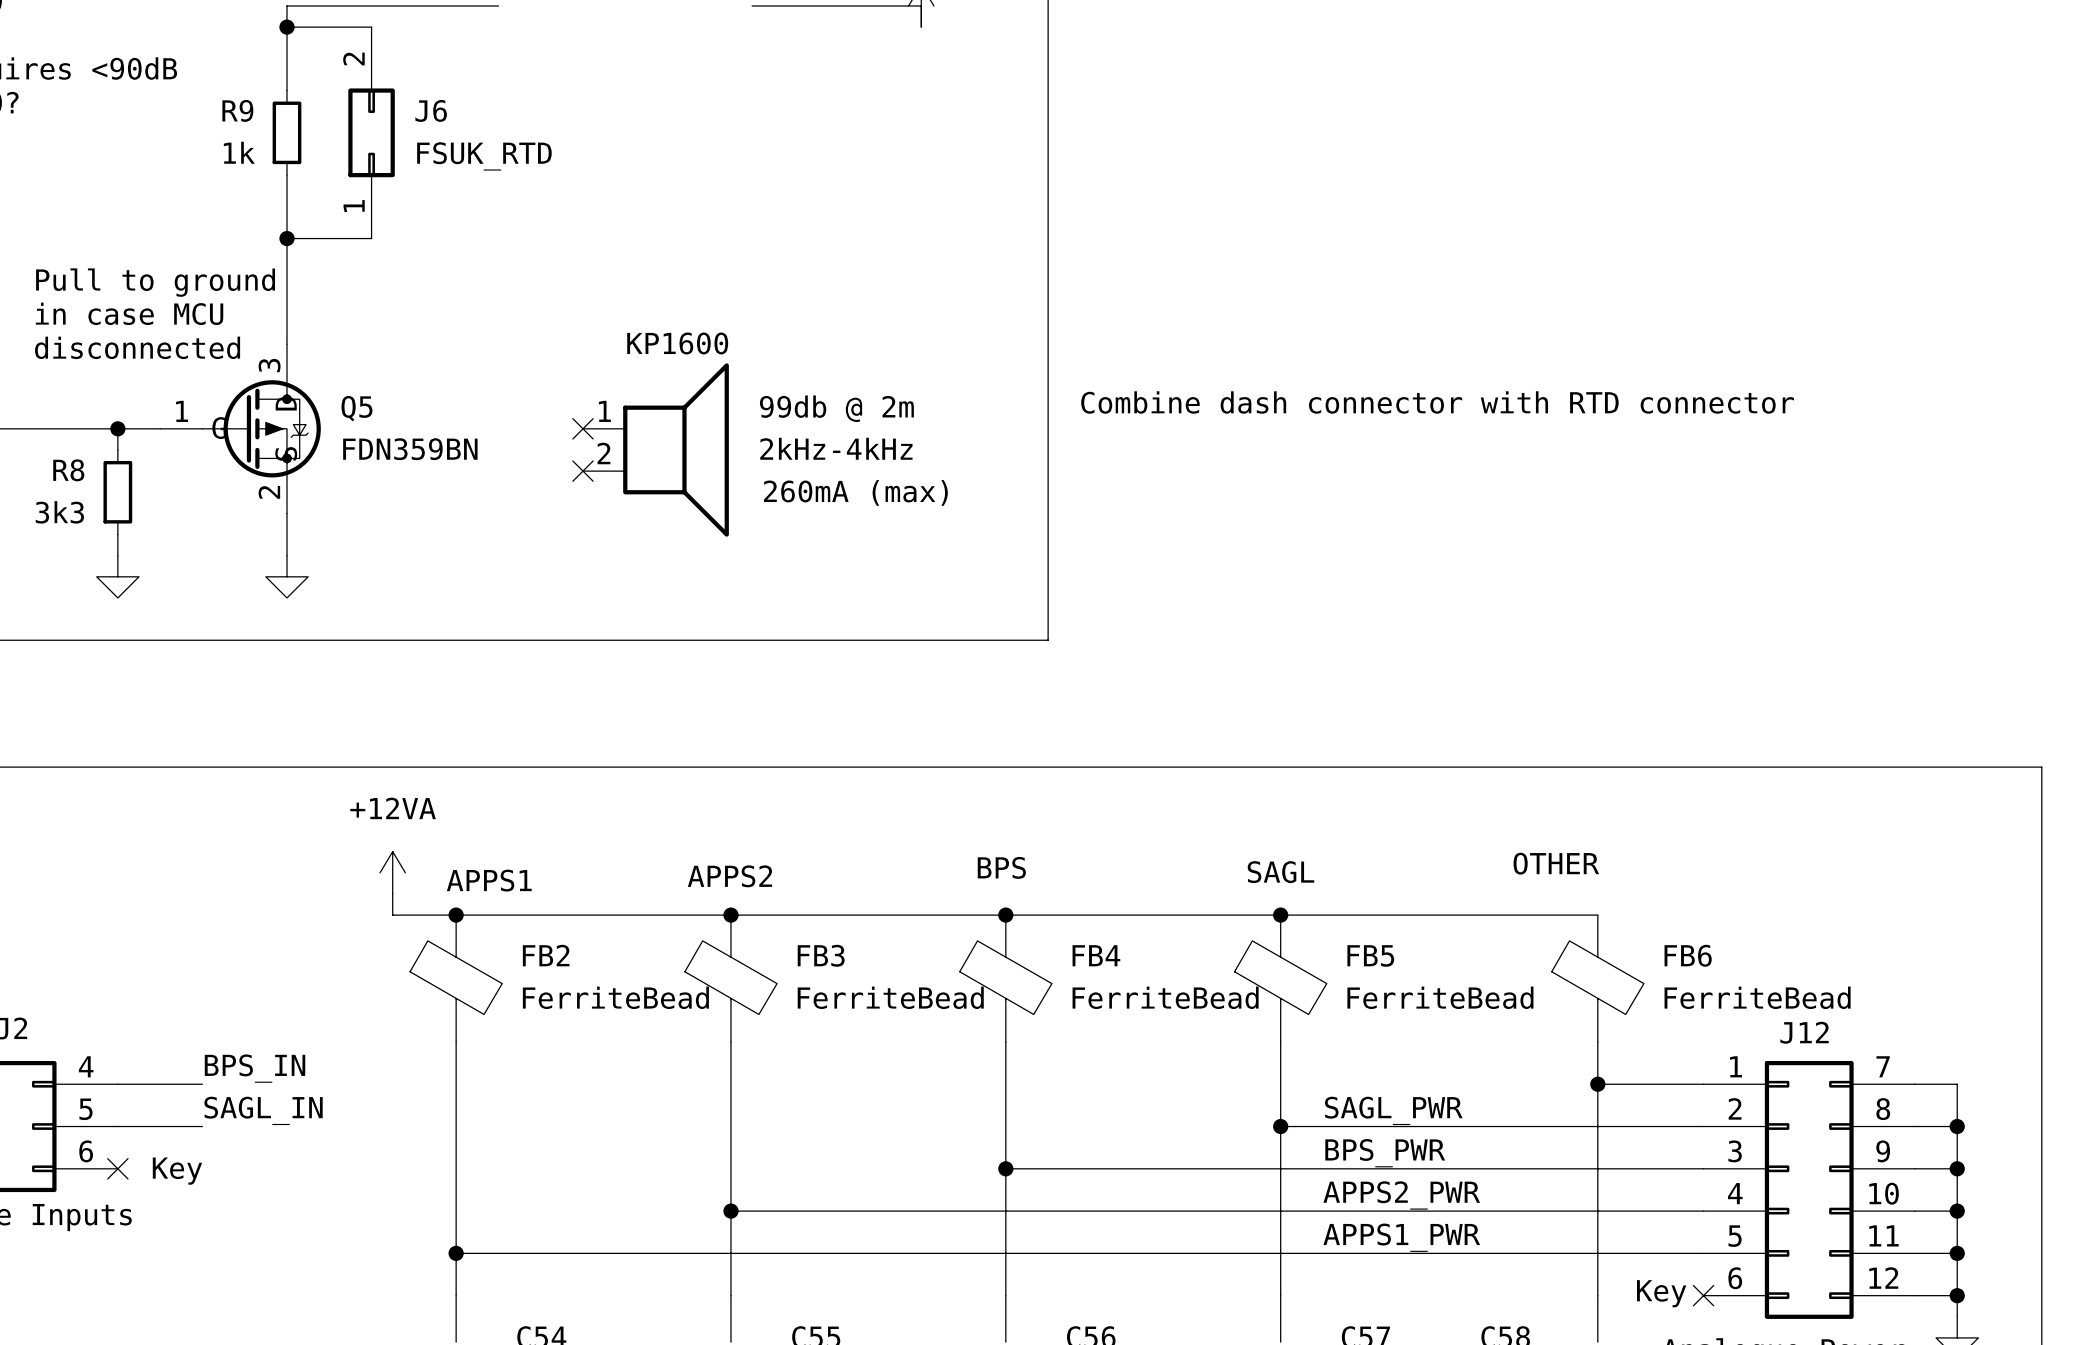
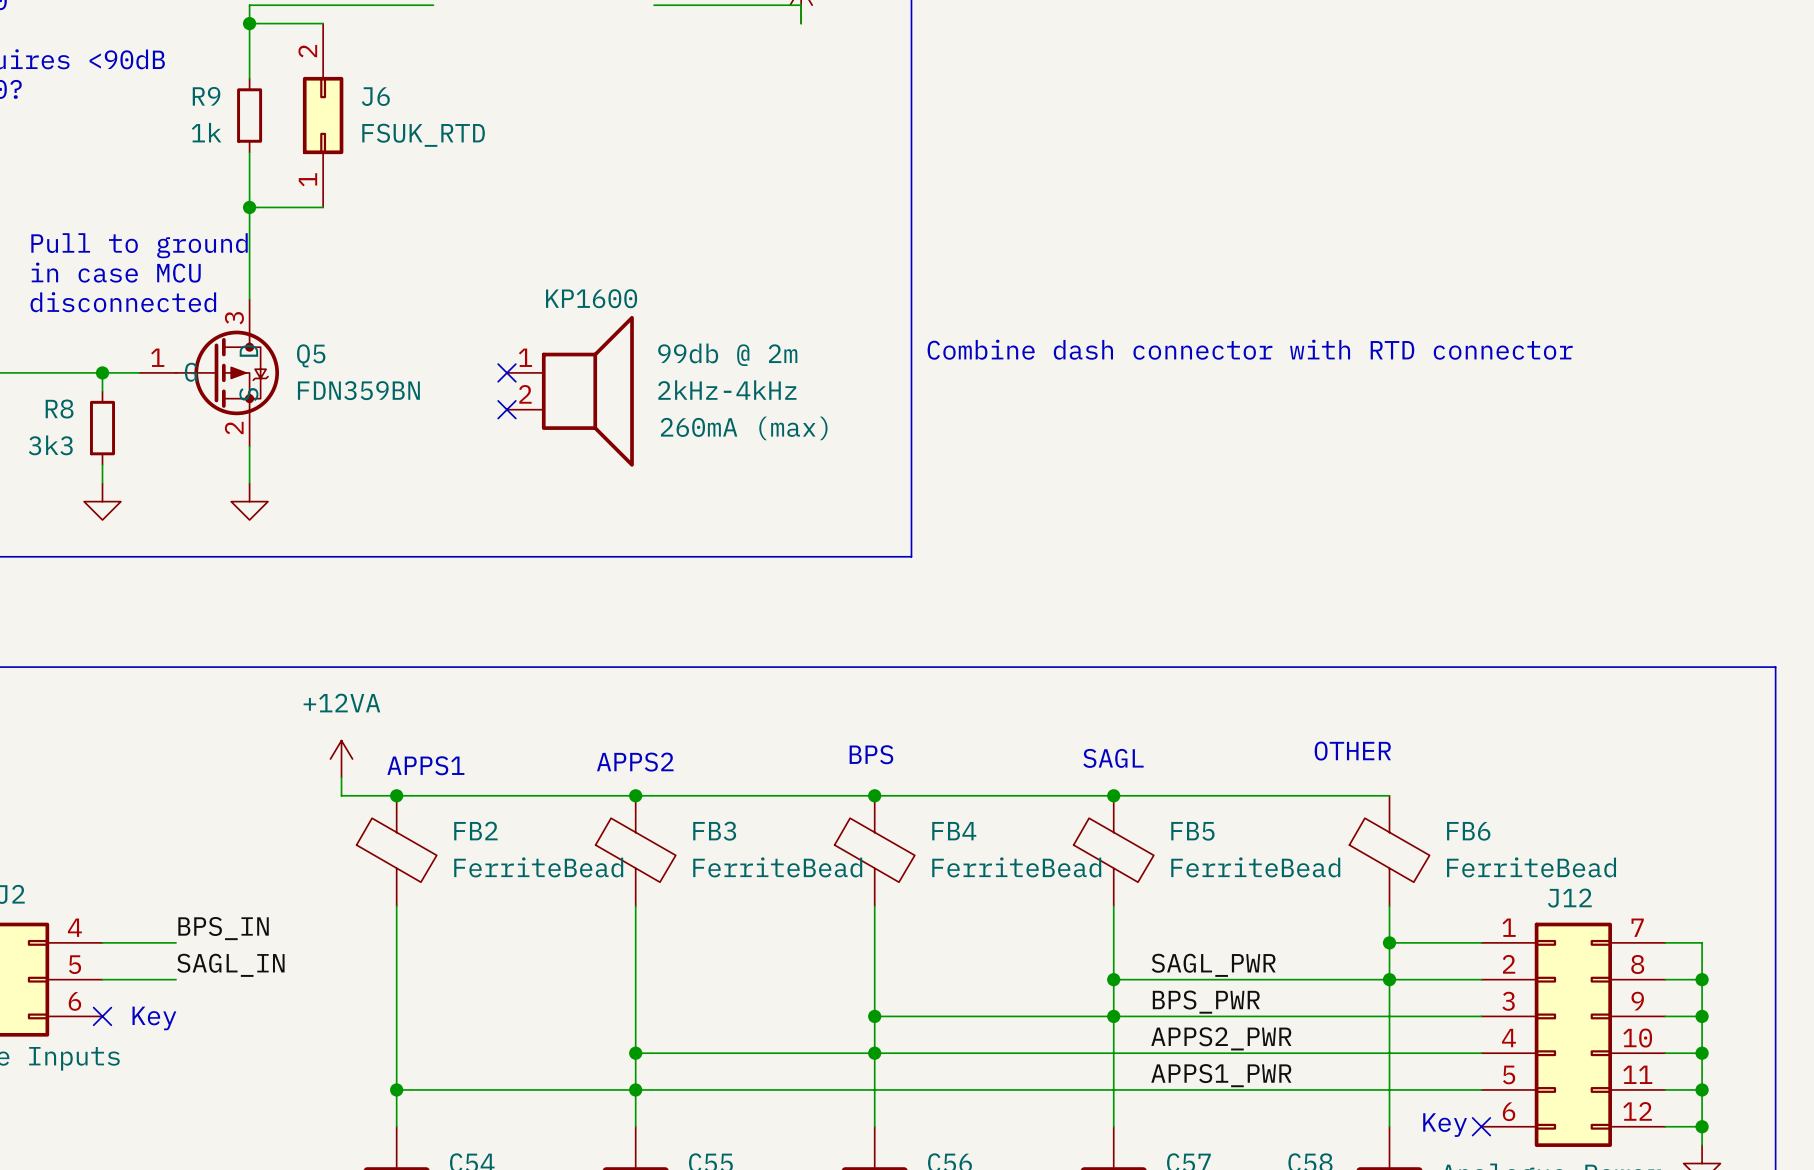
junction: none -> (1389, 979)
junction: none -> (1113, 1016)
junction: none -> (874, 1053)
junction: none -> (635, 1089)

